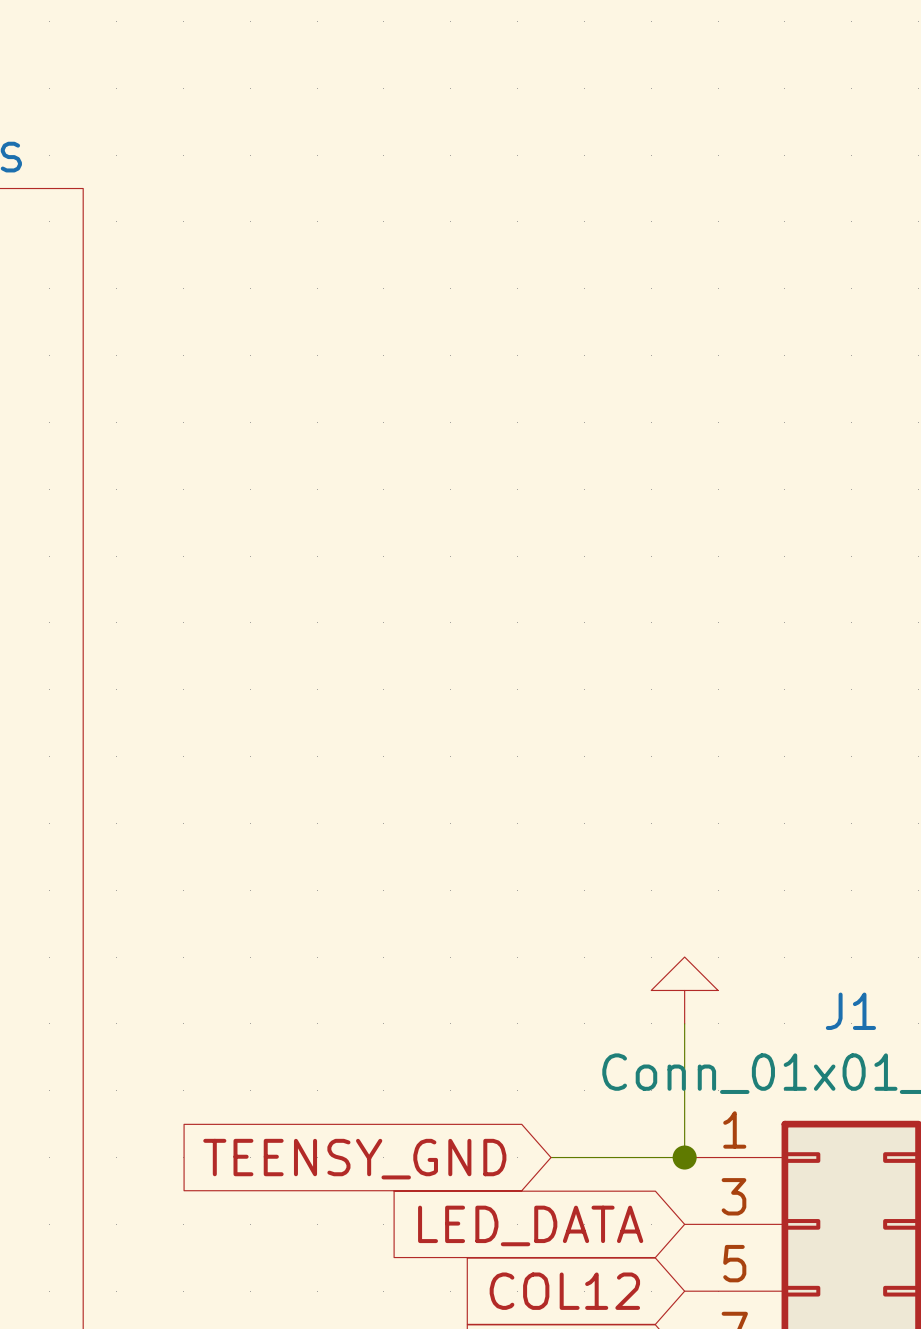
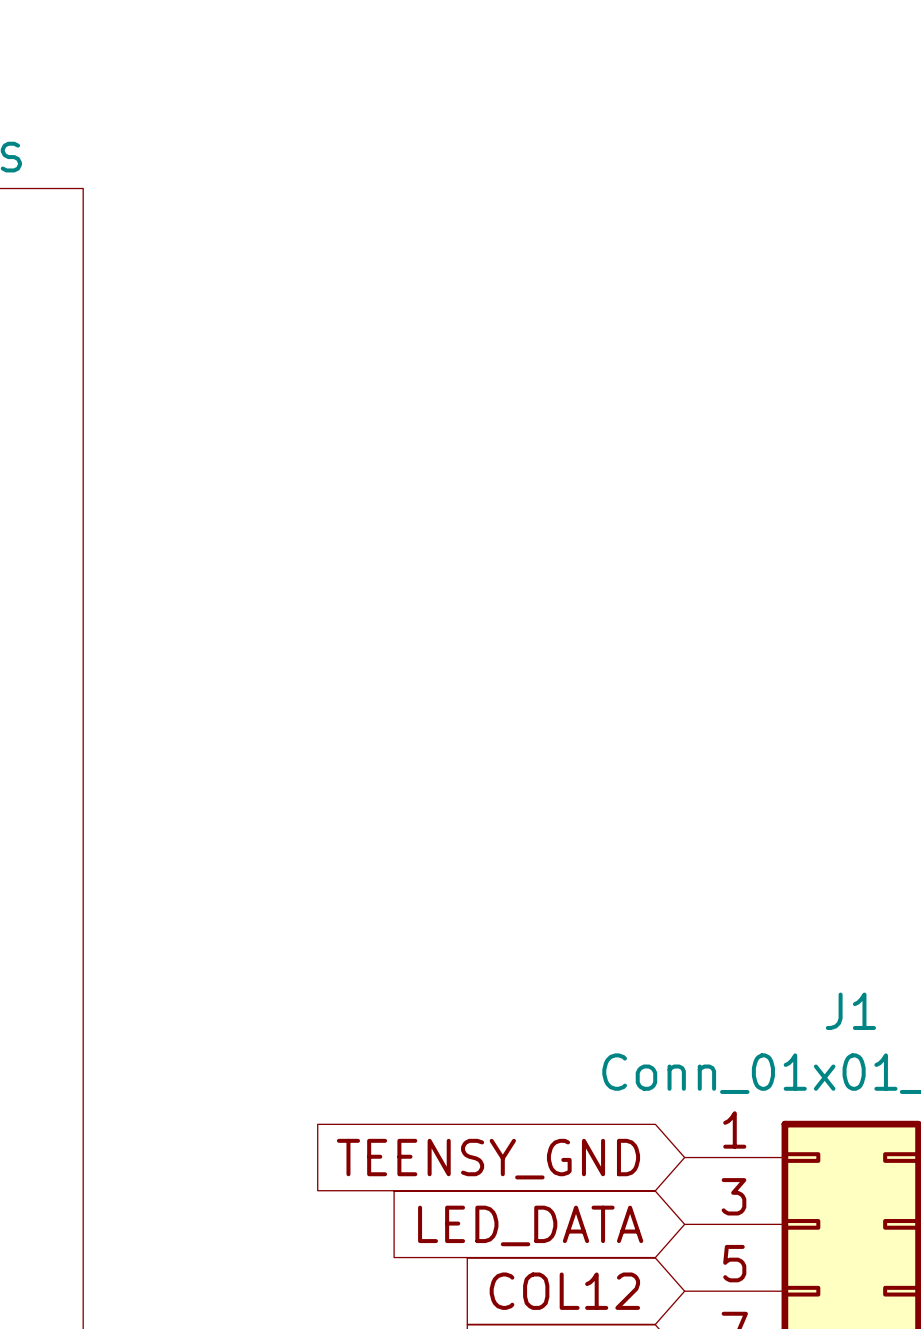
power symbol: (684, 990) -> none
wire: (684, 1023) (684, 1157) (550, 1157) -> none
junction: (684, 1157) -> none
global label position: TEENSY_GND (354, 1159) -> TEENSY_GND (488, 1159)

